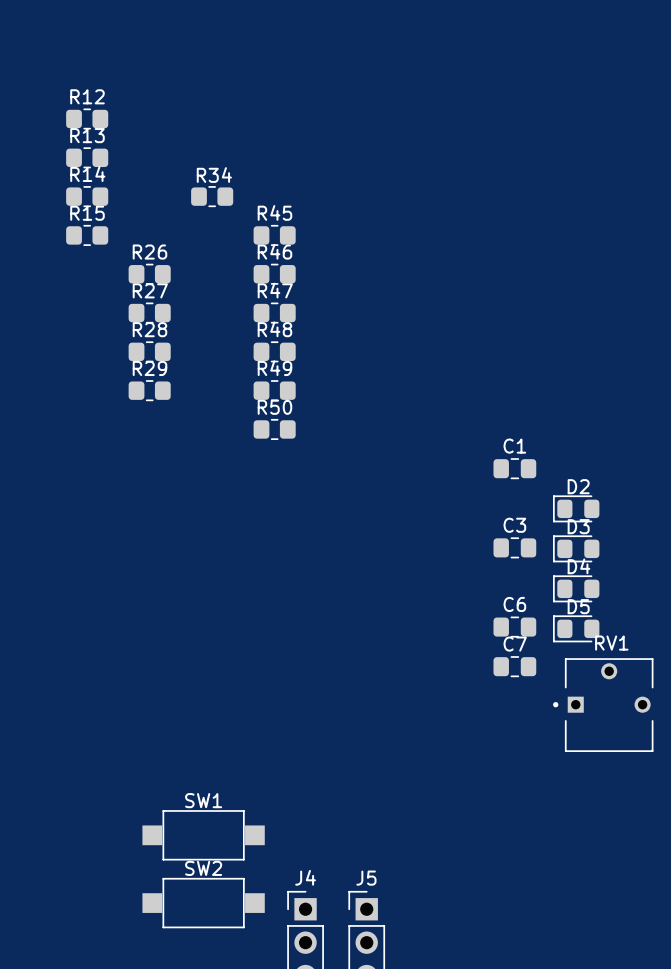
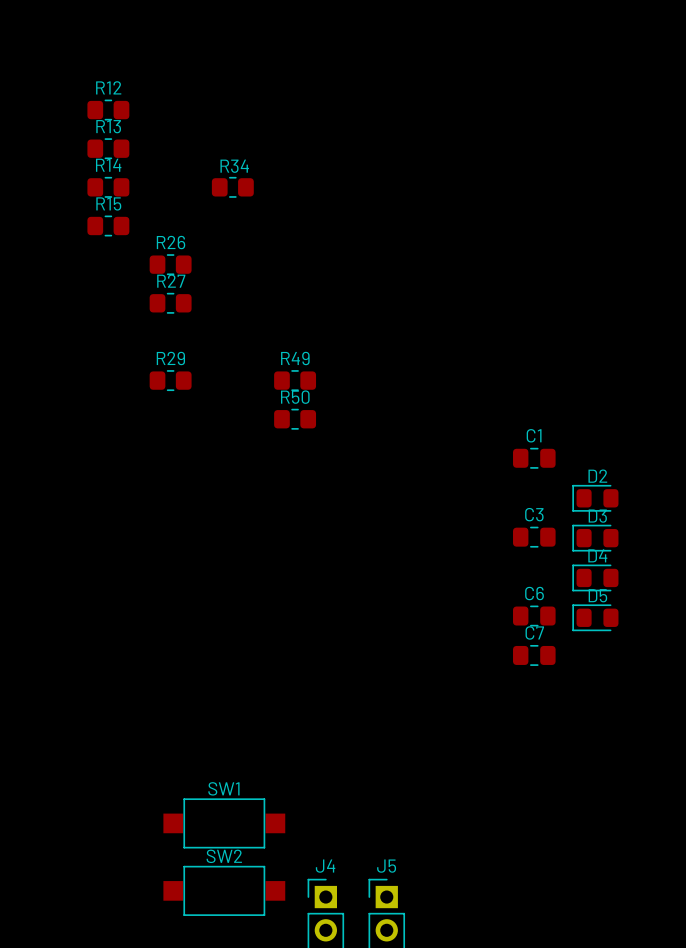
R45: (274, 235) -> none
R46: (274, 274) -> none
R47: (274, 313) -> none
R28: (149, 351) -> none
R48: (274, 351) -> none
RV1: (603, 705) -> none

